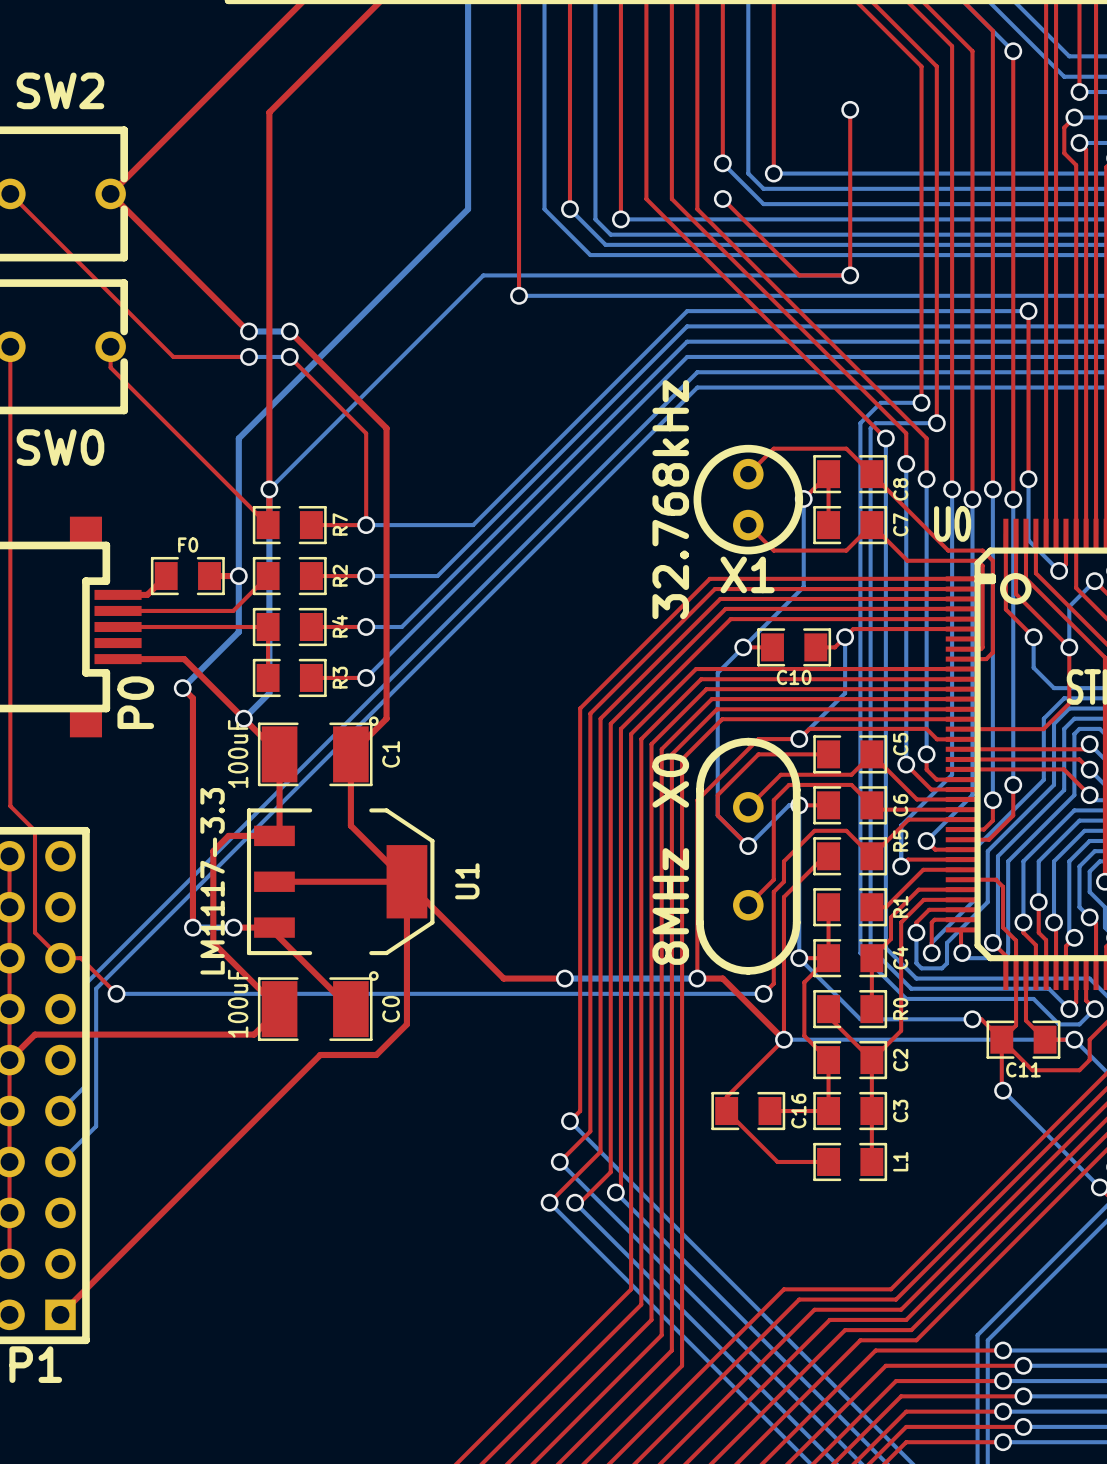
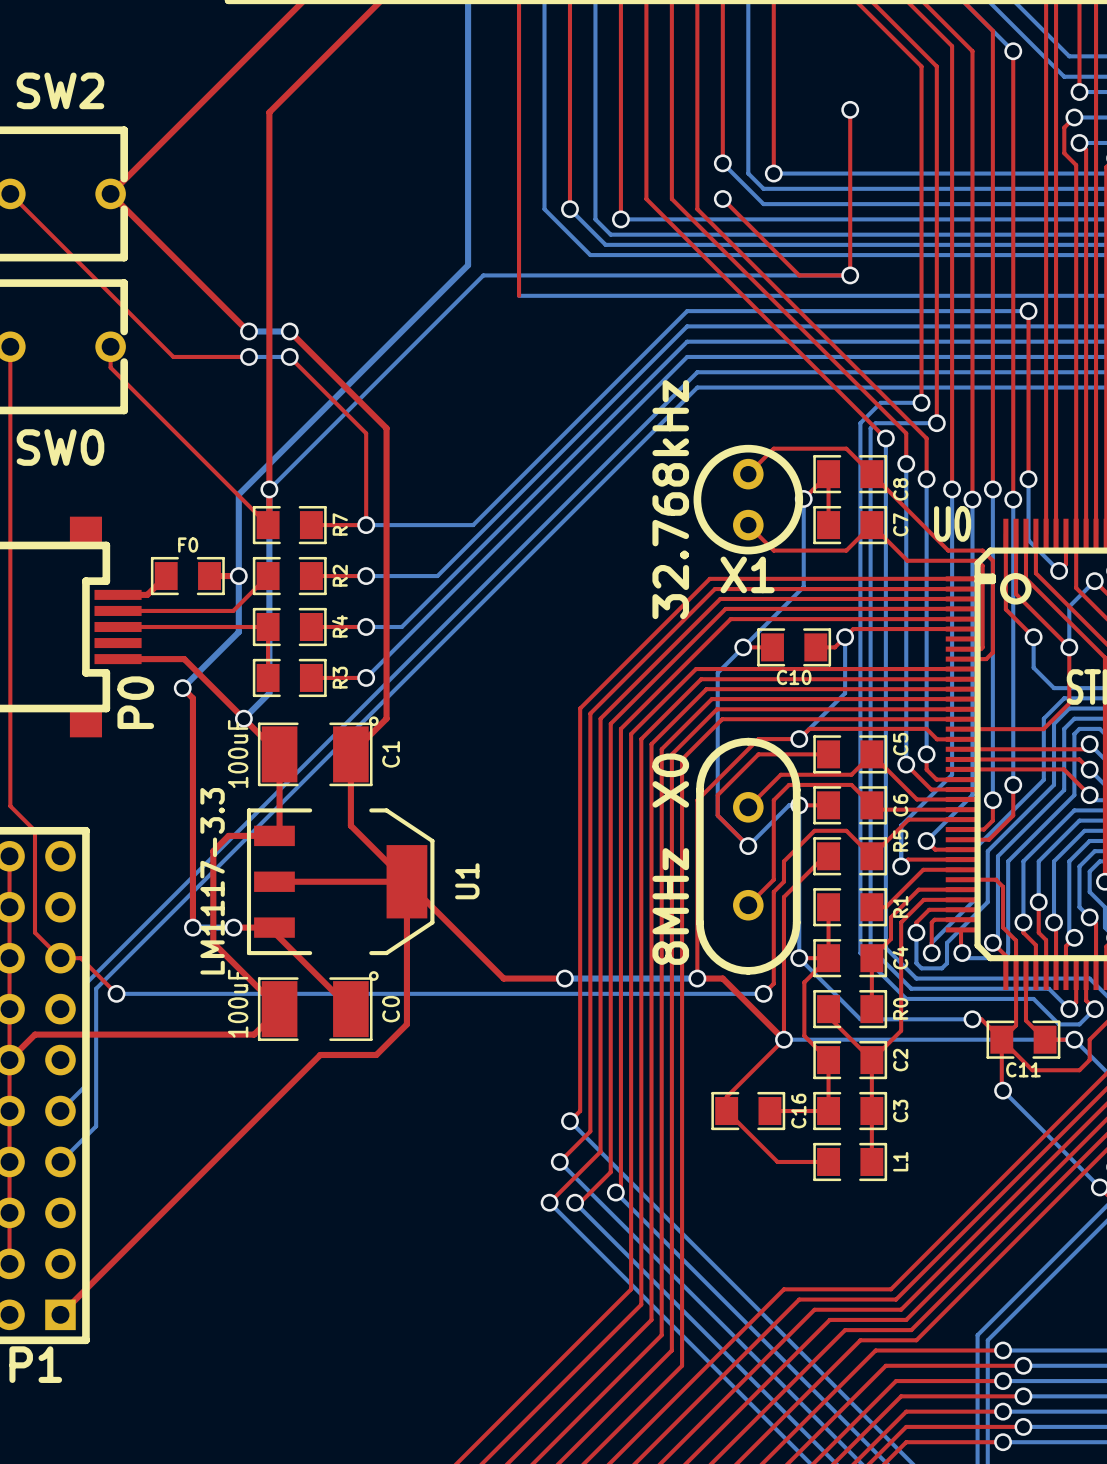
bottom track: (468, 209) (238, 438) (238, 494) -> (468, 209) (468, 265) (238, 494)
via: (519, 295) -> none

